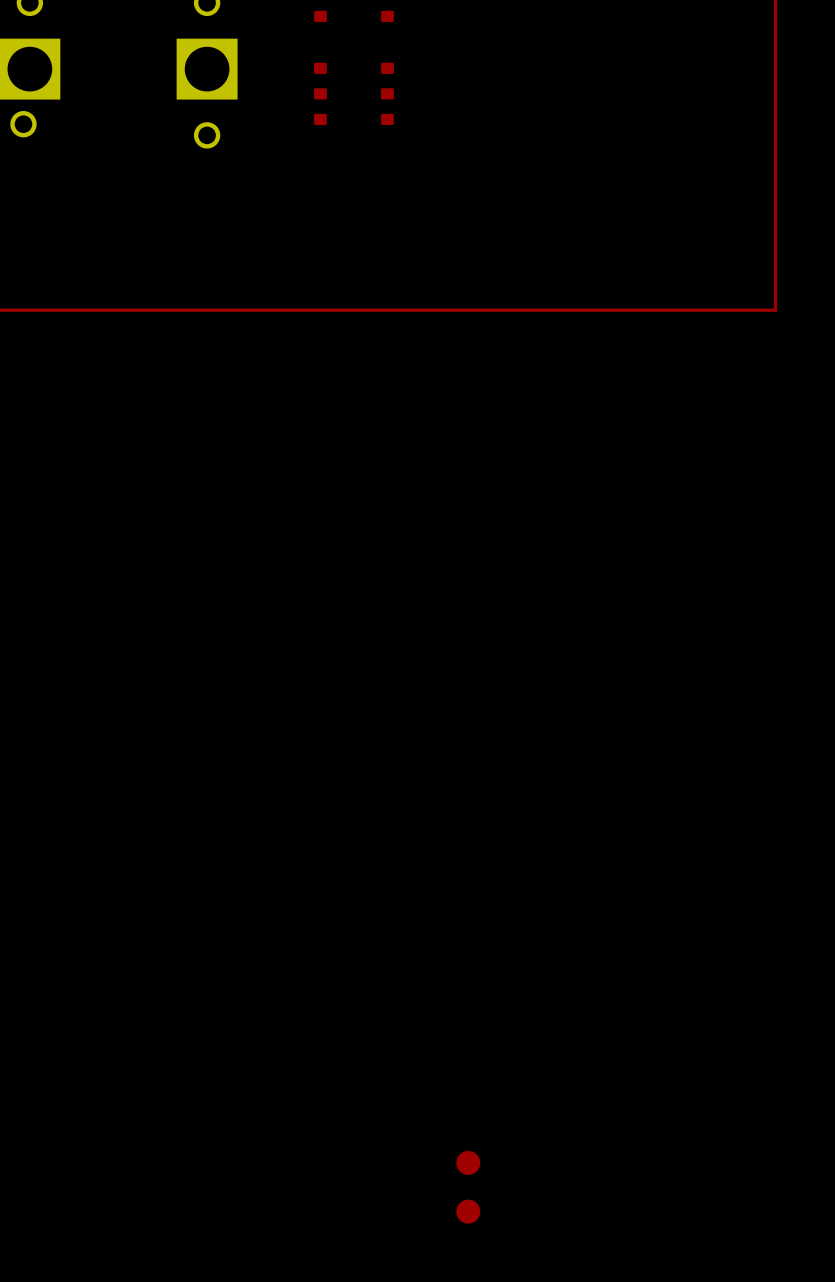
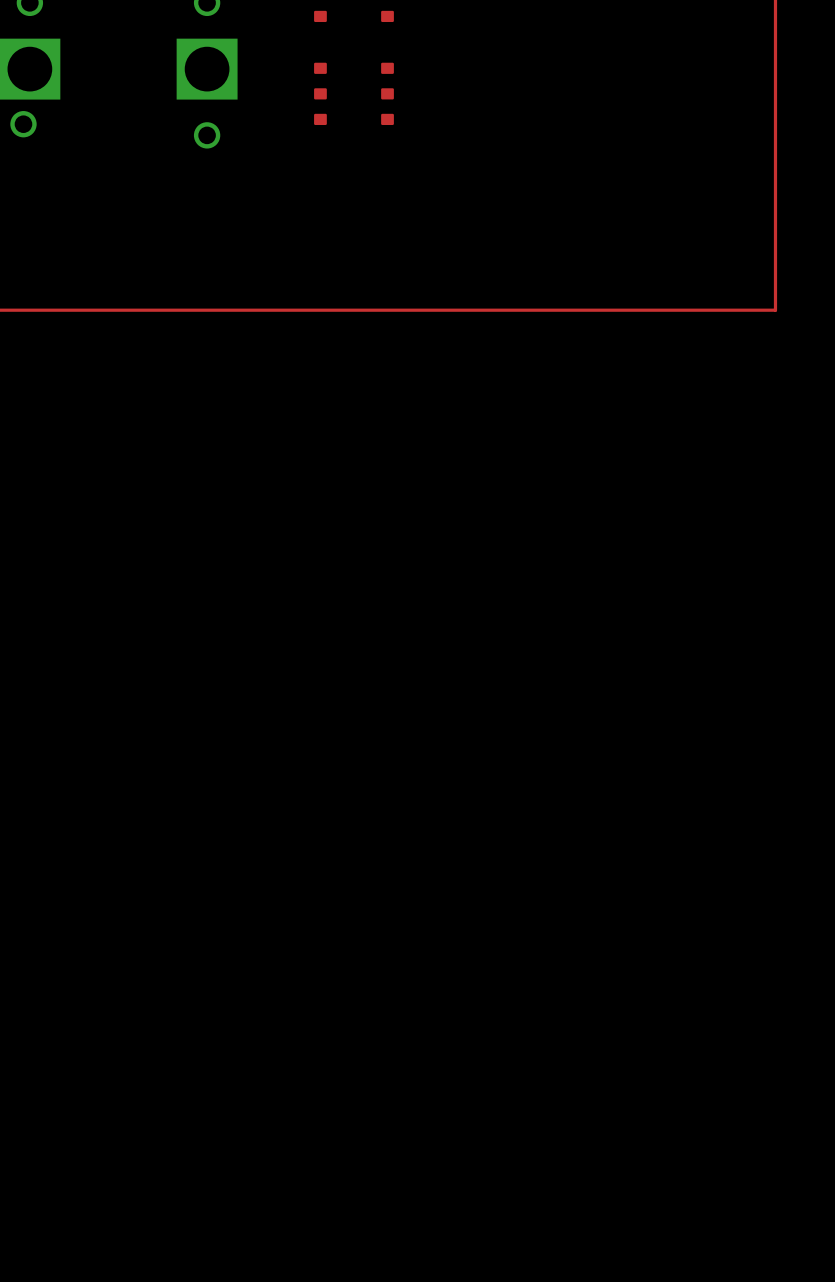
part: (468, 1162) -> none
part: (468, 1211) -> none

